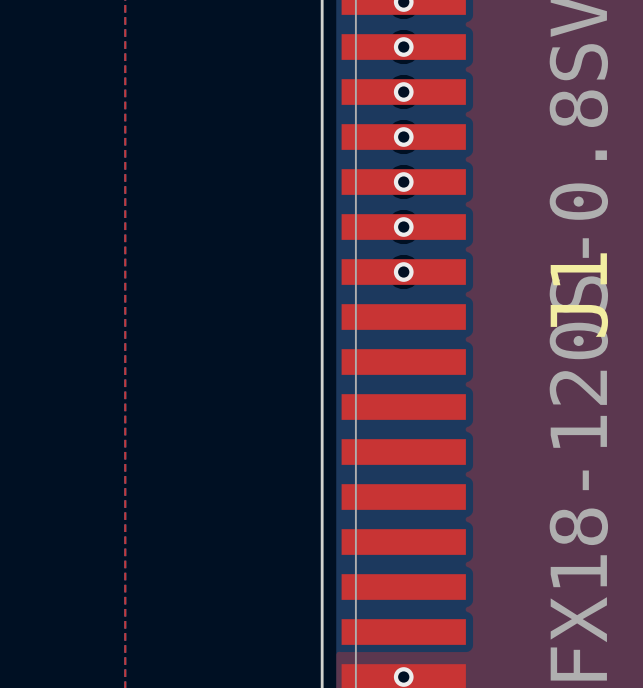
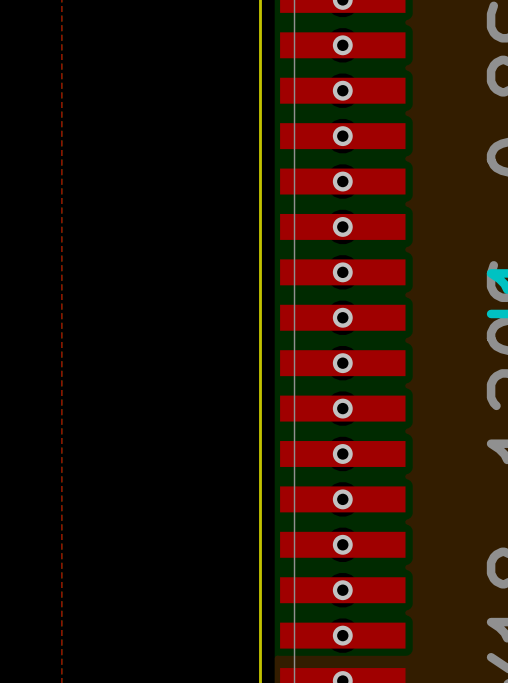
via: none -> (342, 317)
via: none -> (342, 363)
via: none -> (342, 408)
via: none -> (342, 453)
via: none -> (342, 499)
via: none -> (342, 544)
via: none -> (342, 590)
via: none -> (342, 635)

